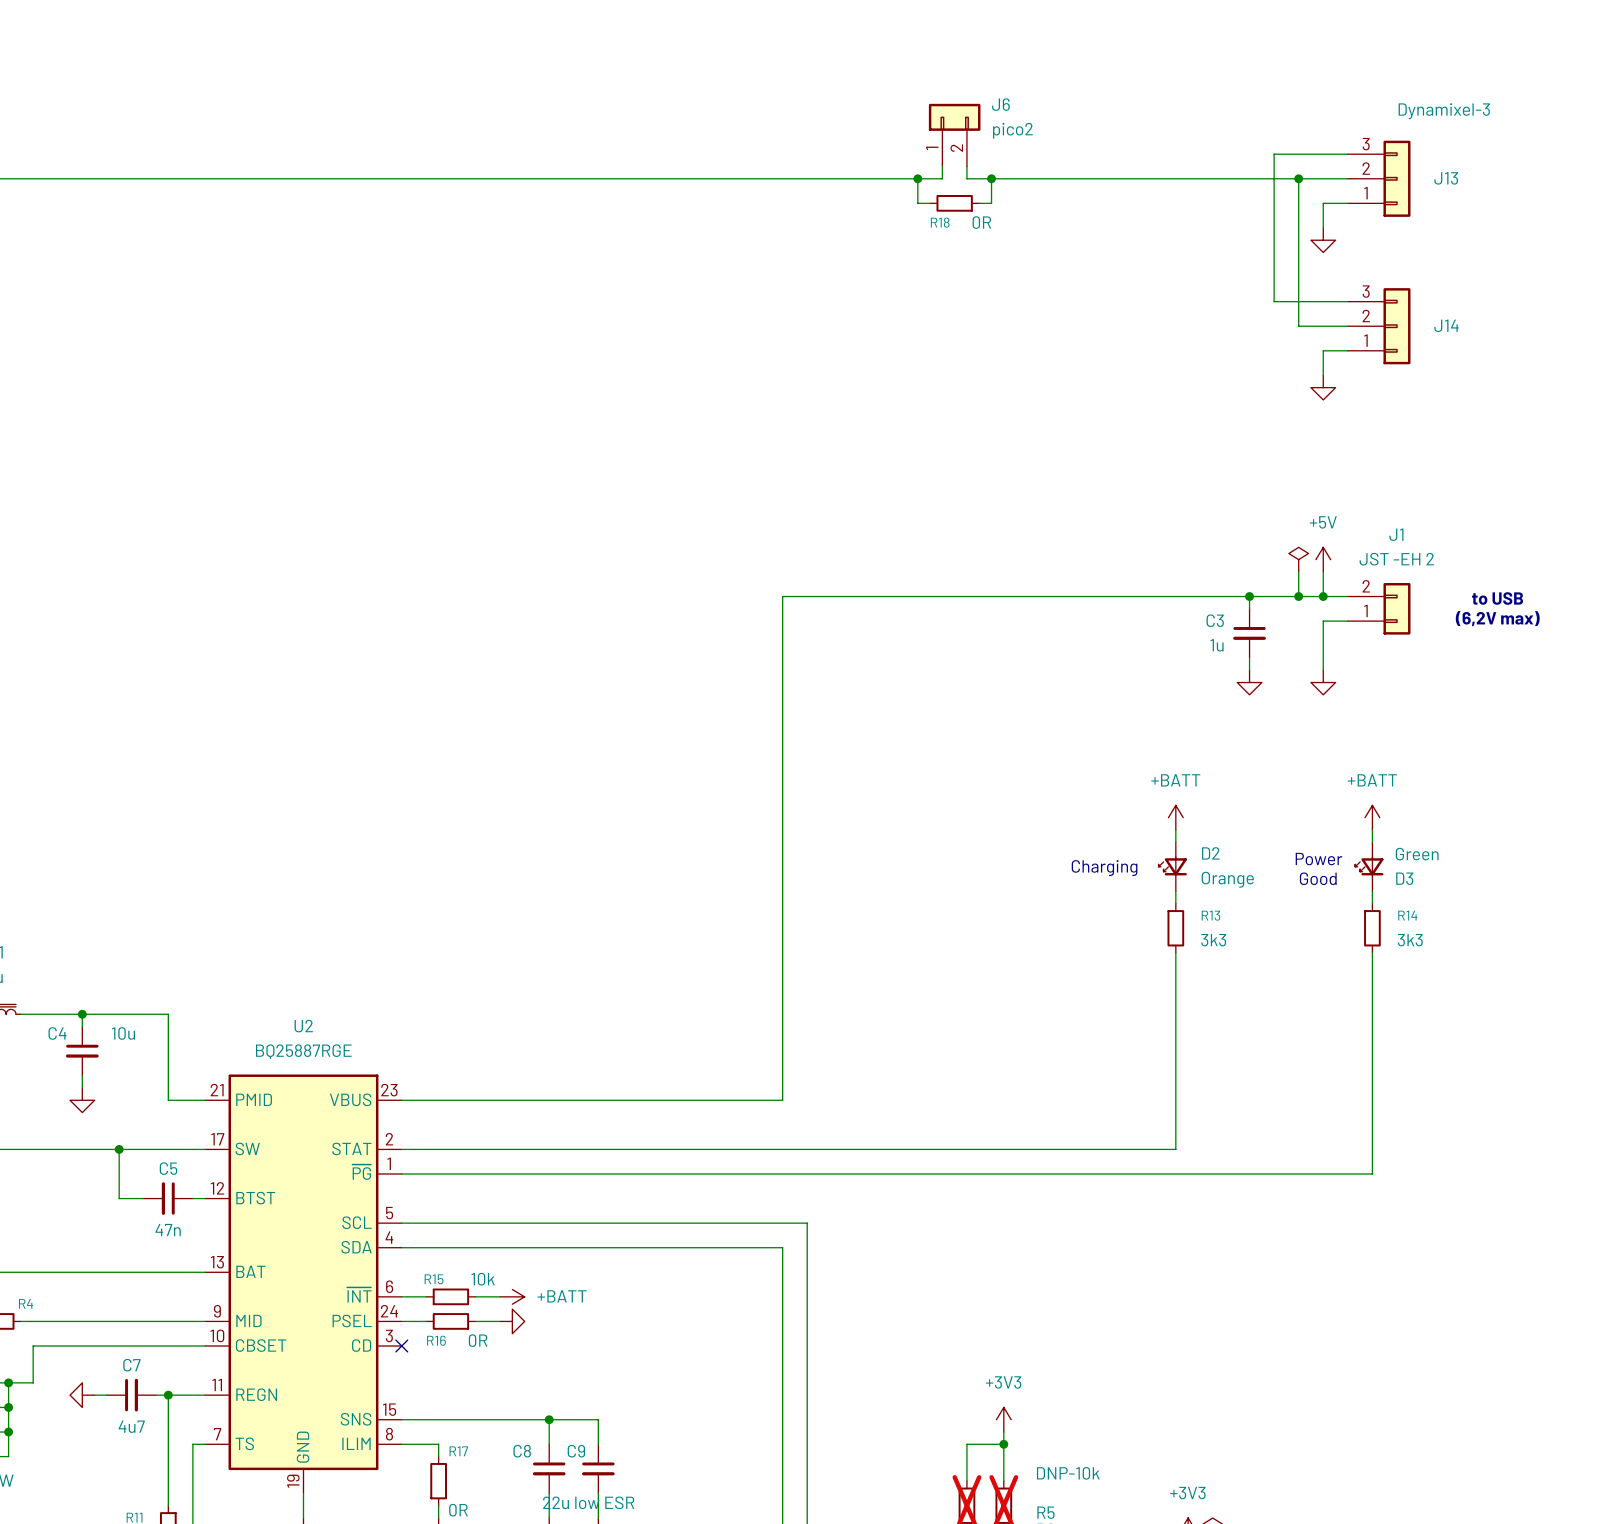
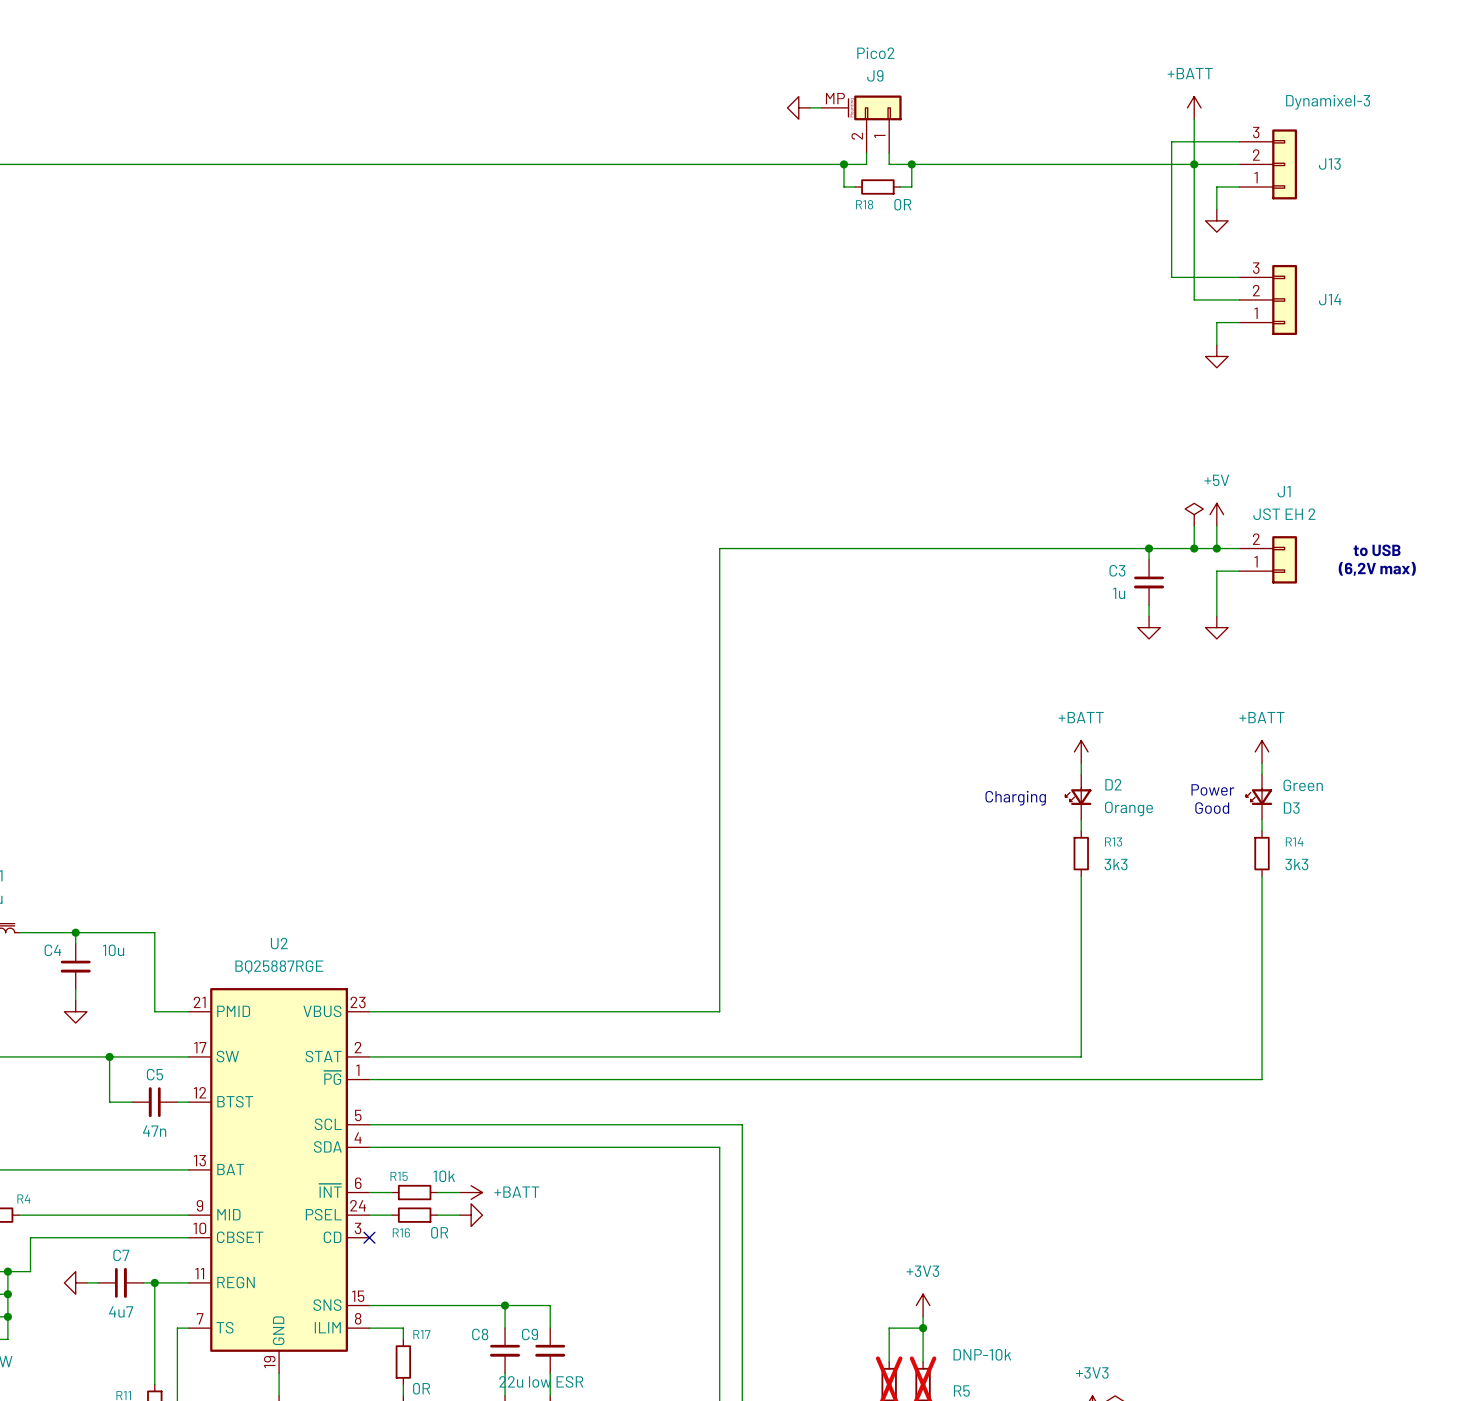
power symbol: none -> (798, 107)
wire: none -> (810, 107) (821, 107)
power symbol: none -> +BATT (1194, 107)
wire: none -> (1194, 119) (1194, 164)
J9: none -> Pico2 (861, 124)
J6: pico2 (954, 135) -> none
J1 value: JST -EH 2 (1396, 559) -> JST EH 2 (1284, 514)

